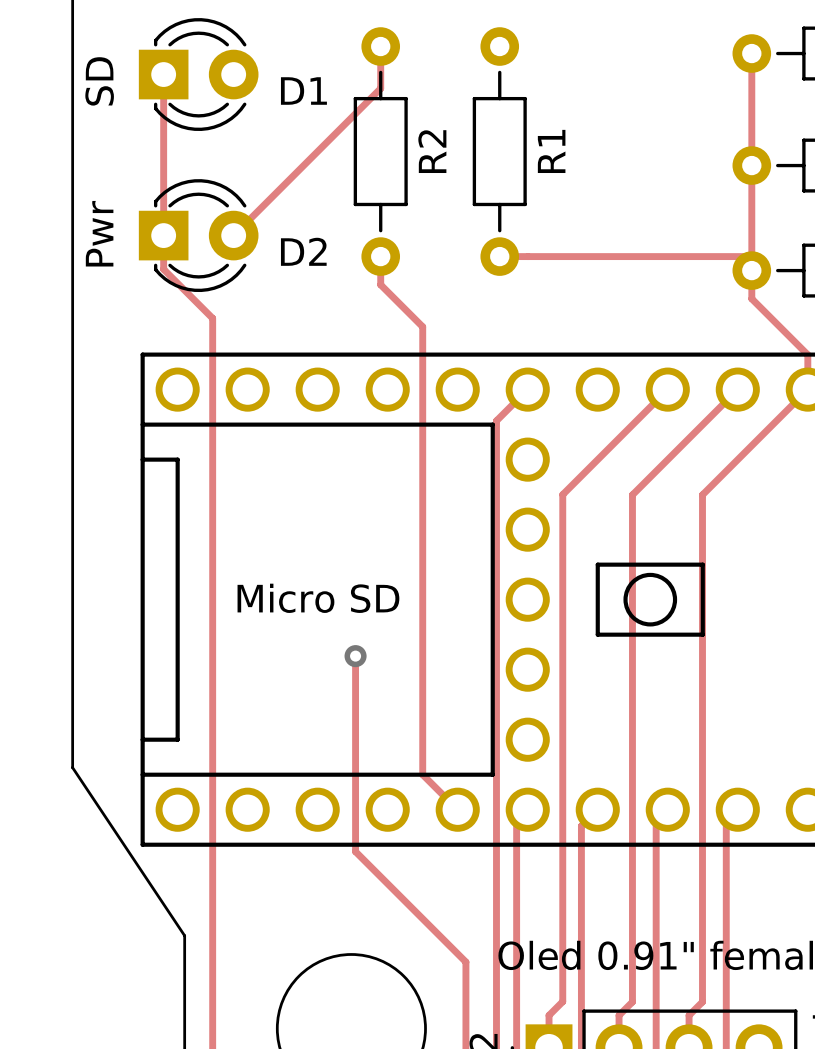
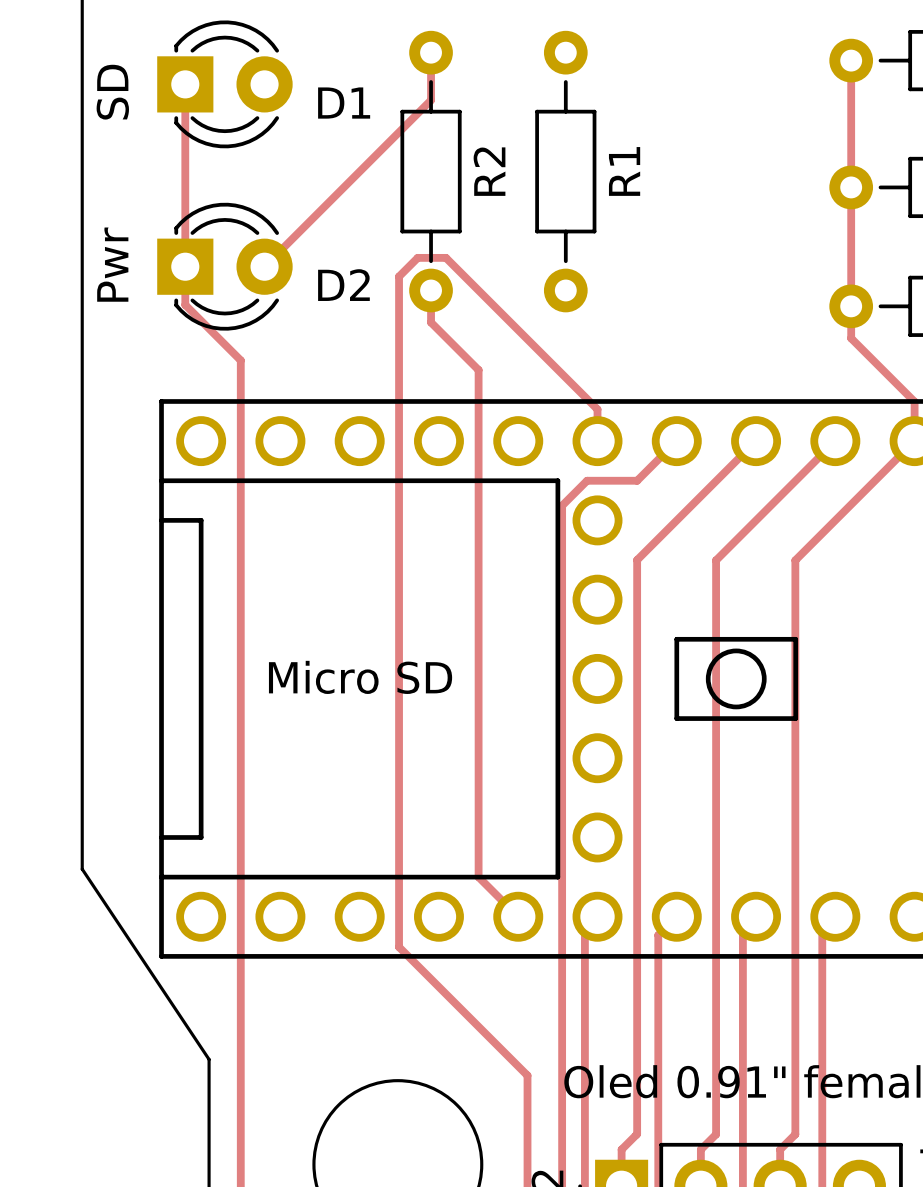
track: (499, 256) (751, 256) -> none
track: (527, 389) (496, 420) (496, 446) -> (676, 441) (637, 480) (587, 480) (562, 505)
track: (355, 656) (355, 851) (465, 962) -> (597, 441) (597, 409) (445, 257) (417, 257) (399, 276) (399, 947) (527, 1075) (527, 1089)
via: (355, 656) -> none

